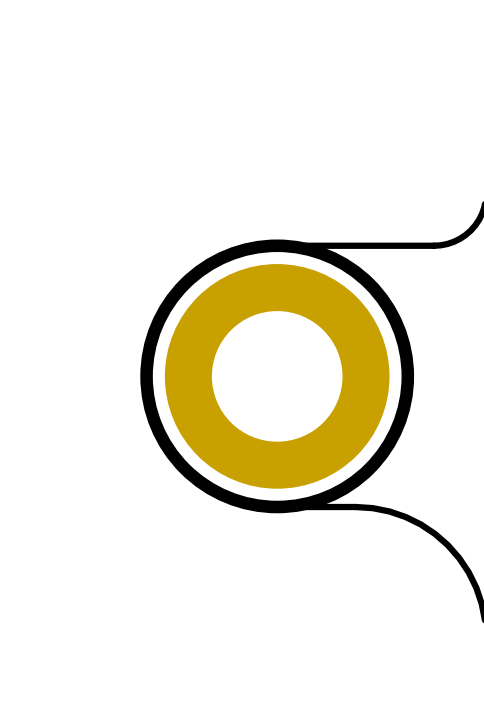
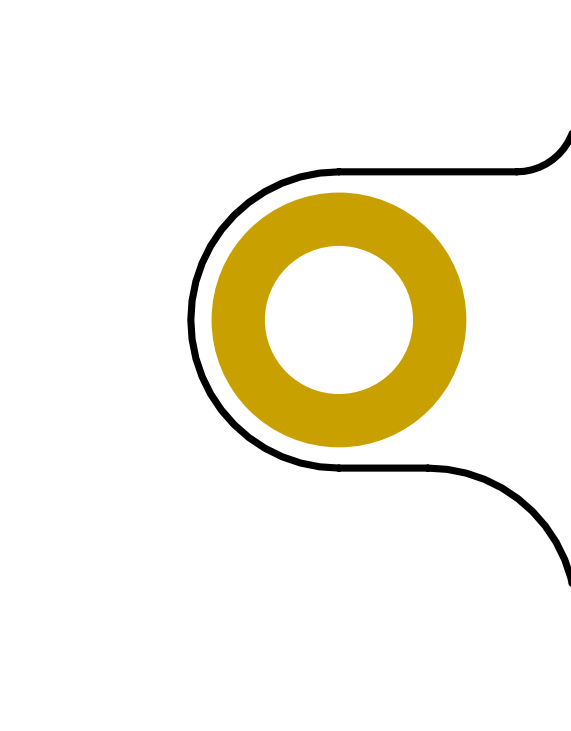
drawing: [140, 239, 415, 514] -> none

